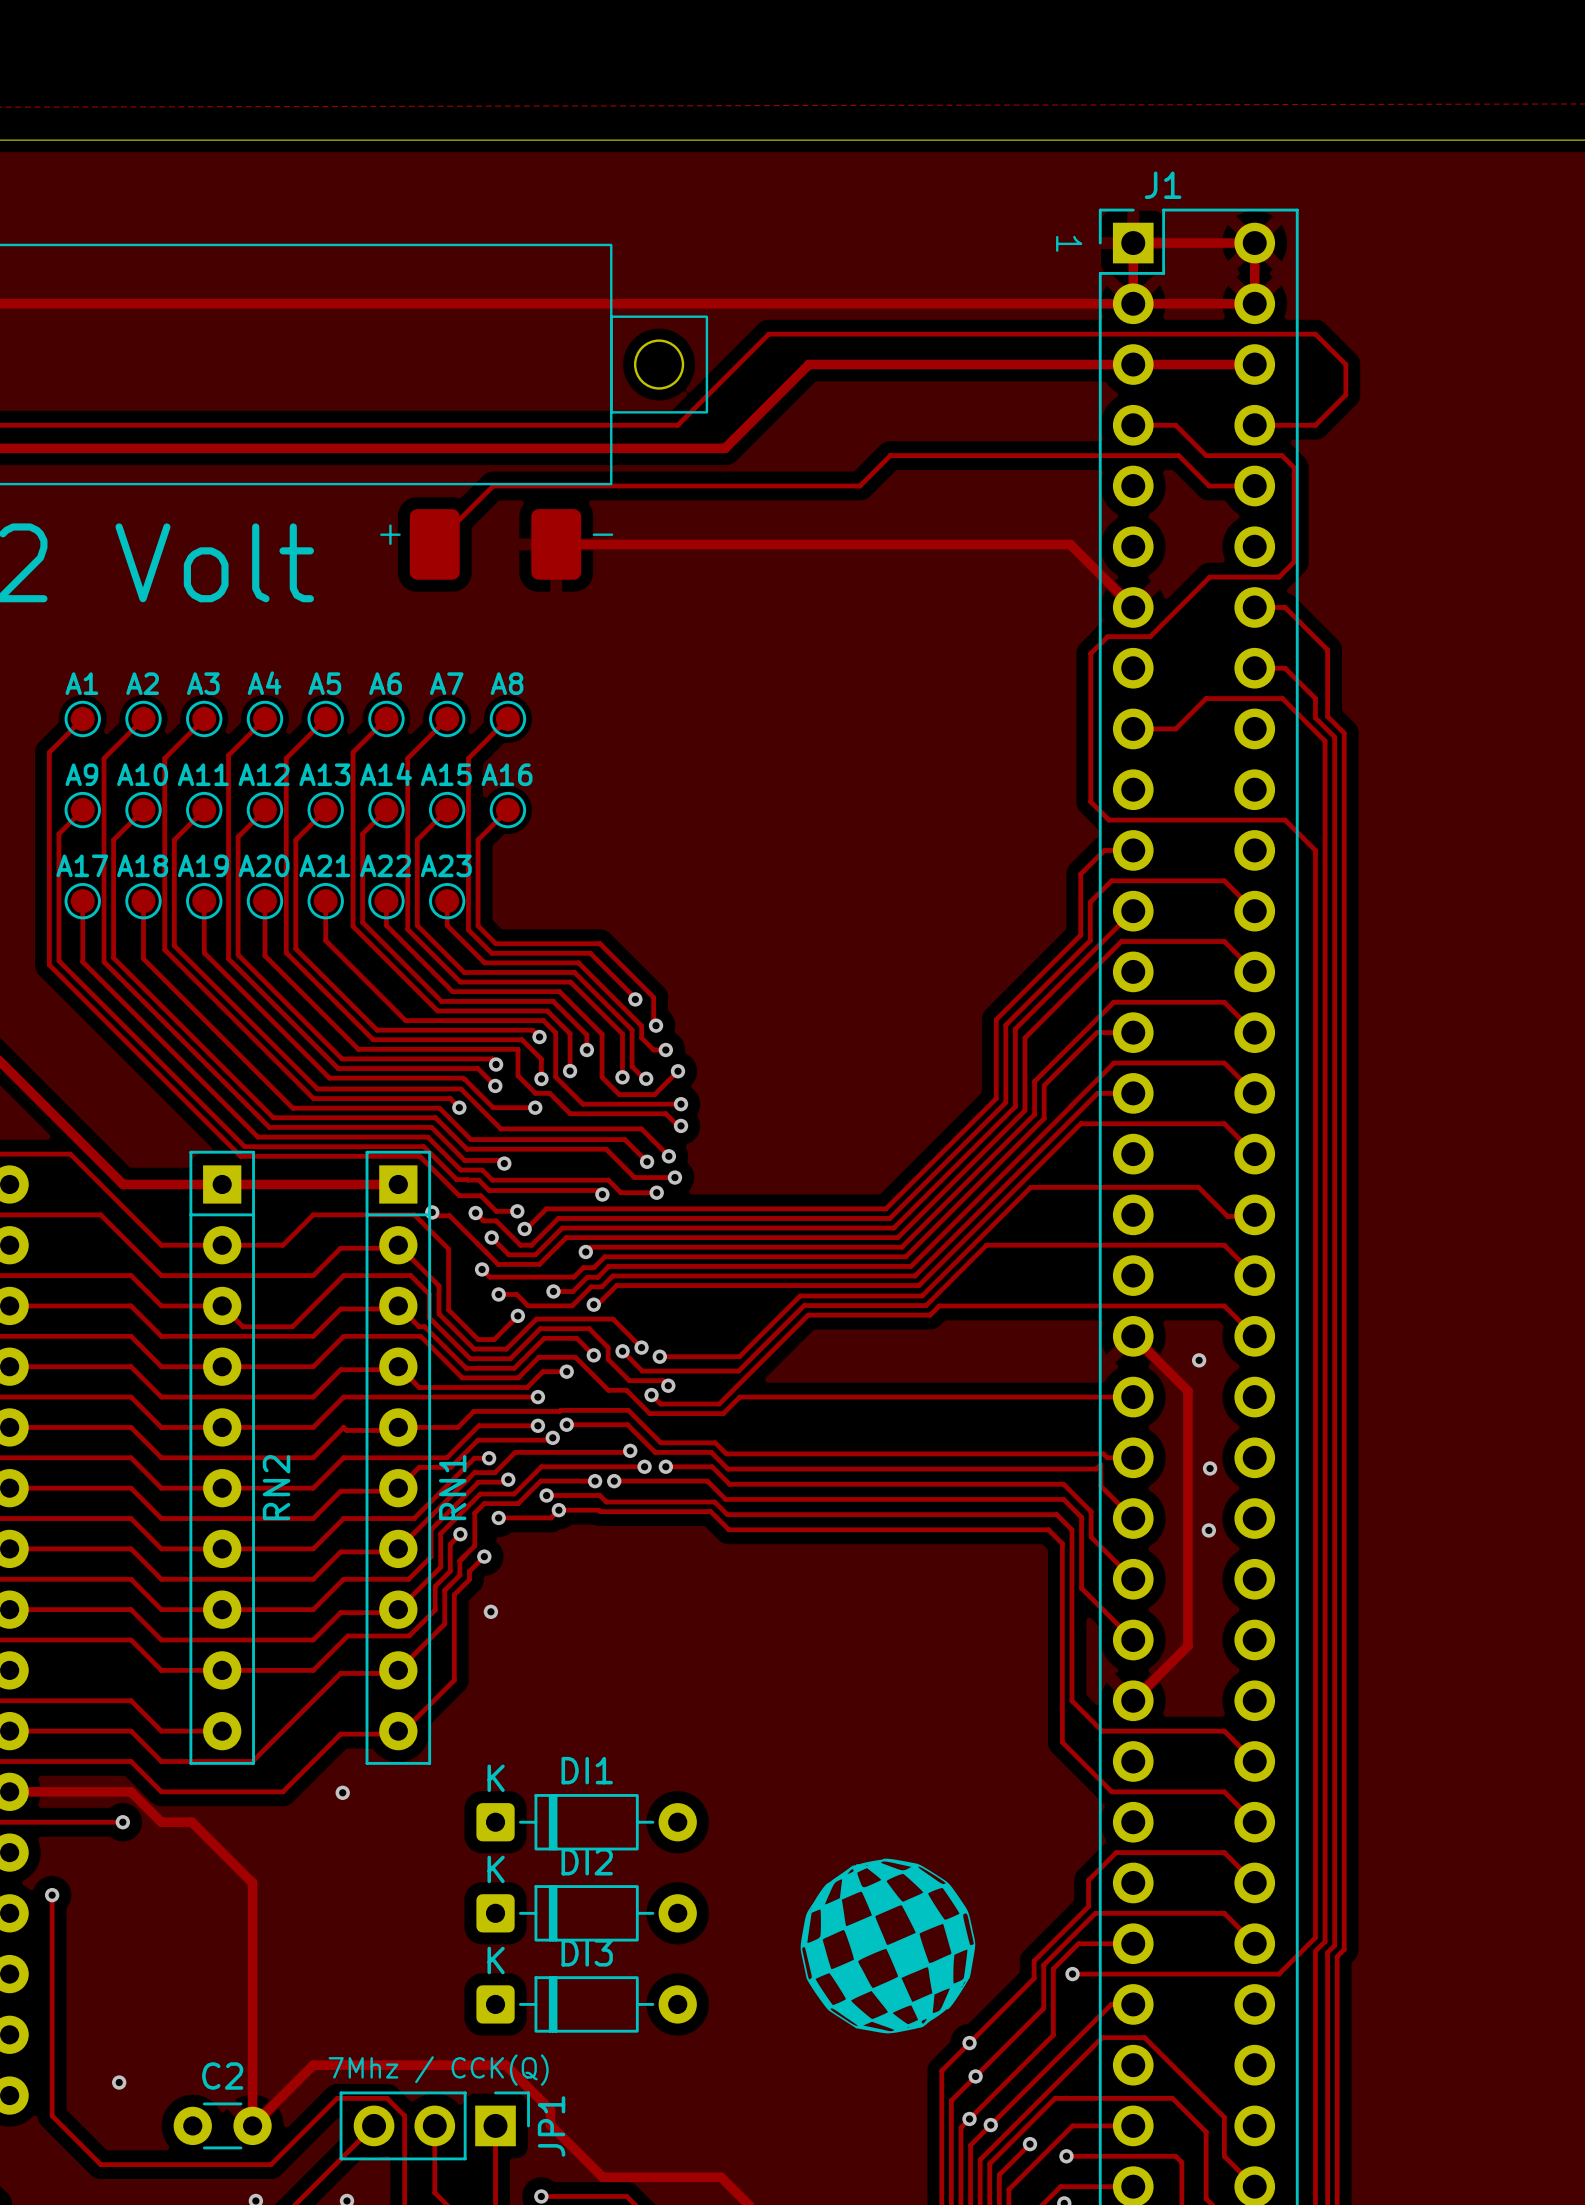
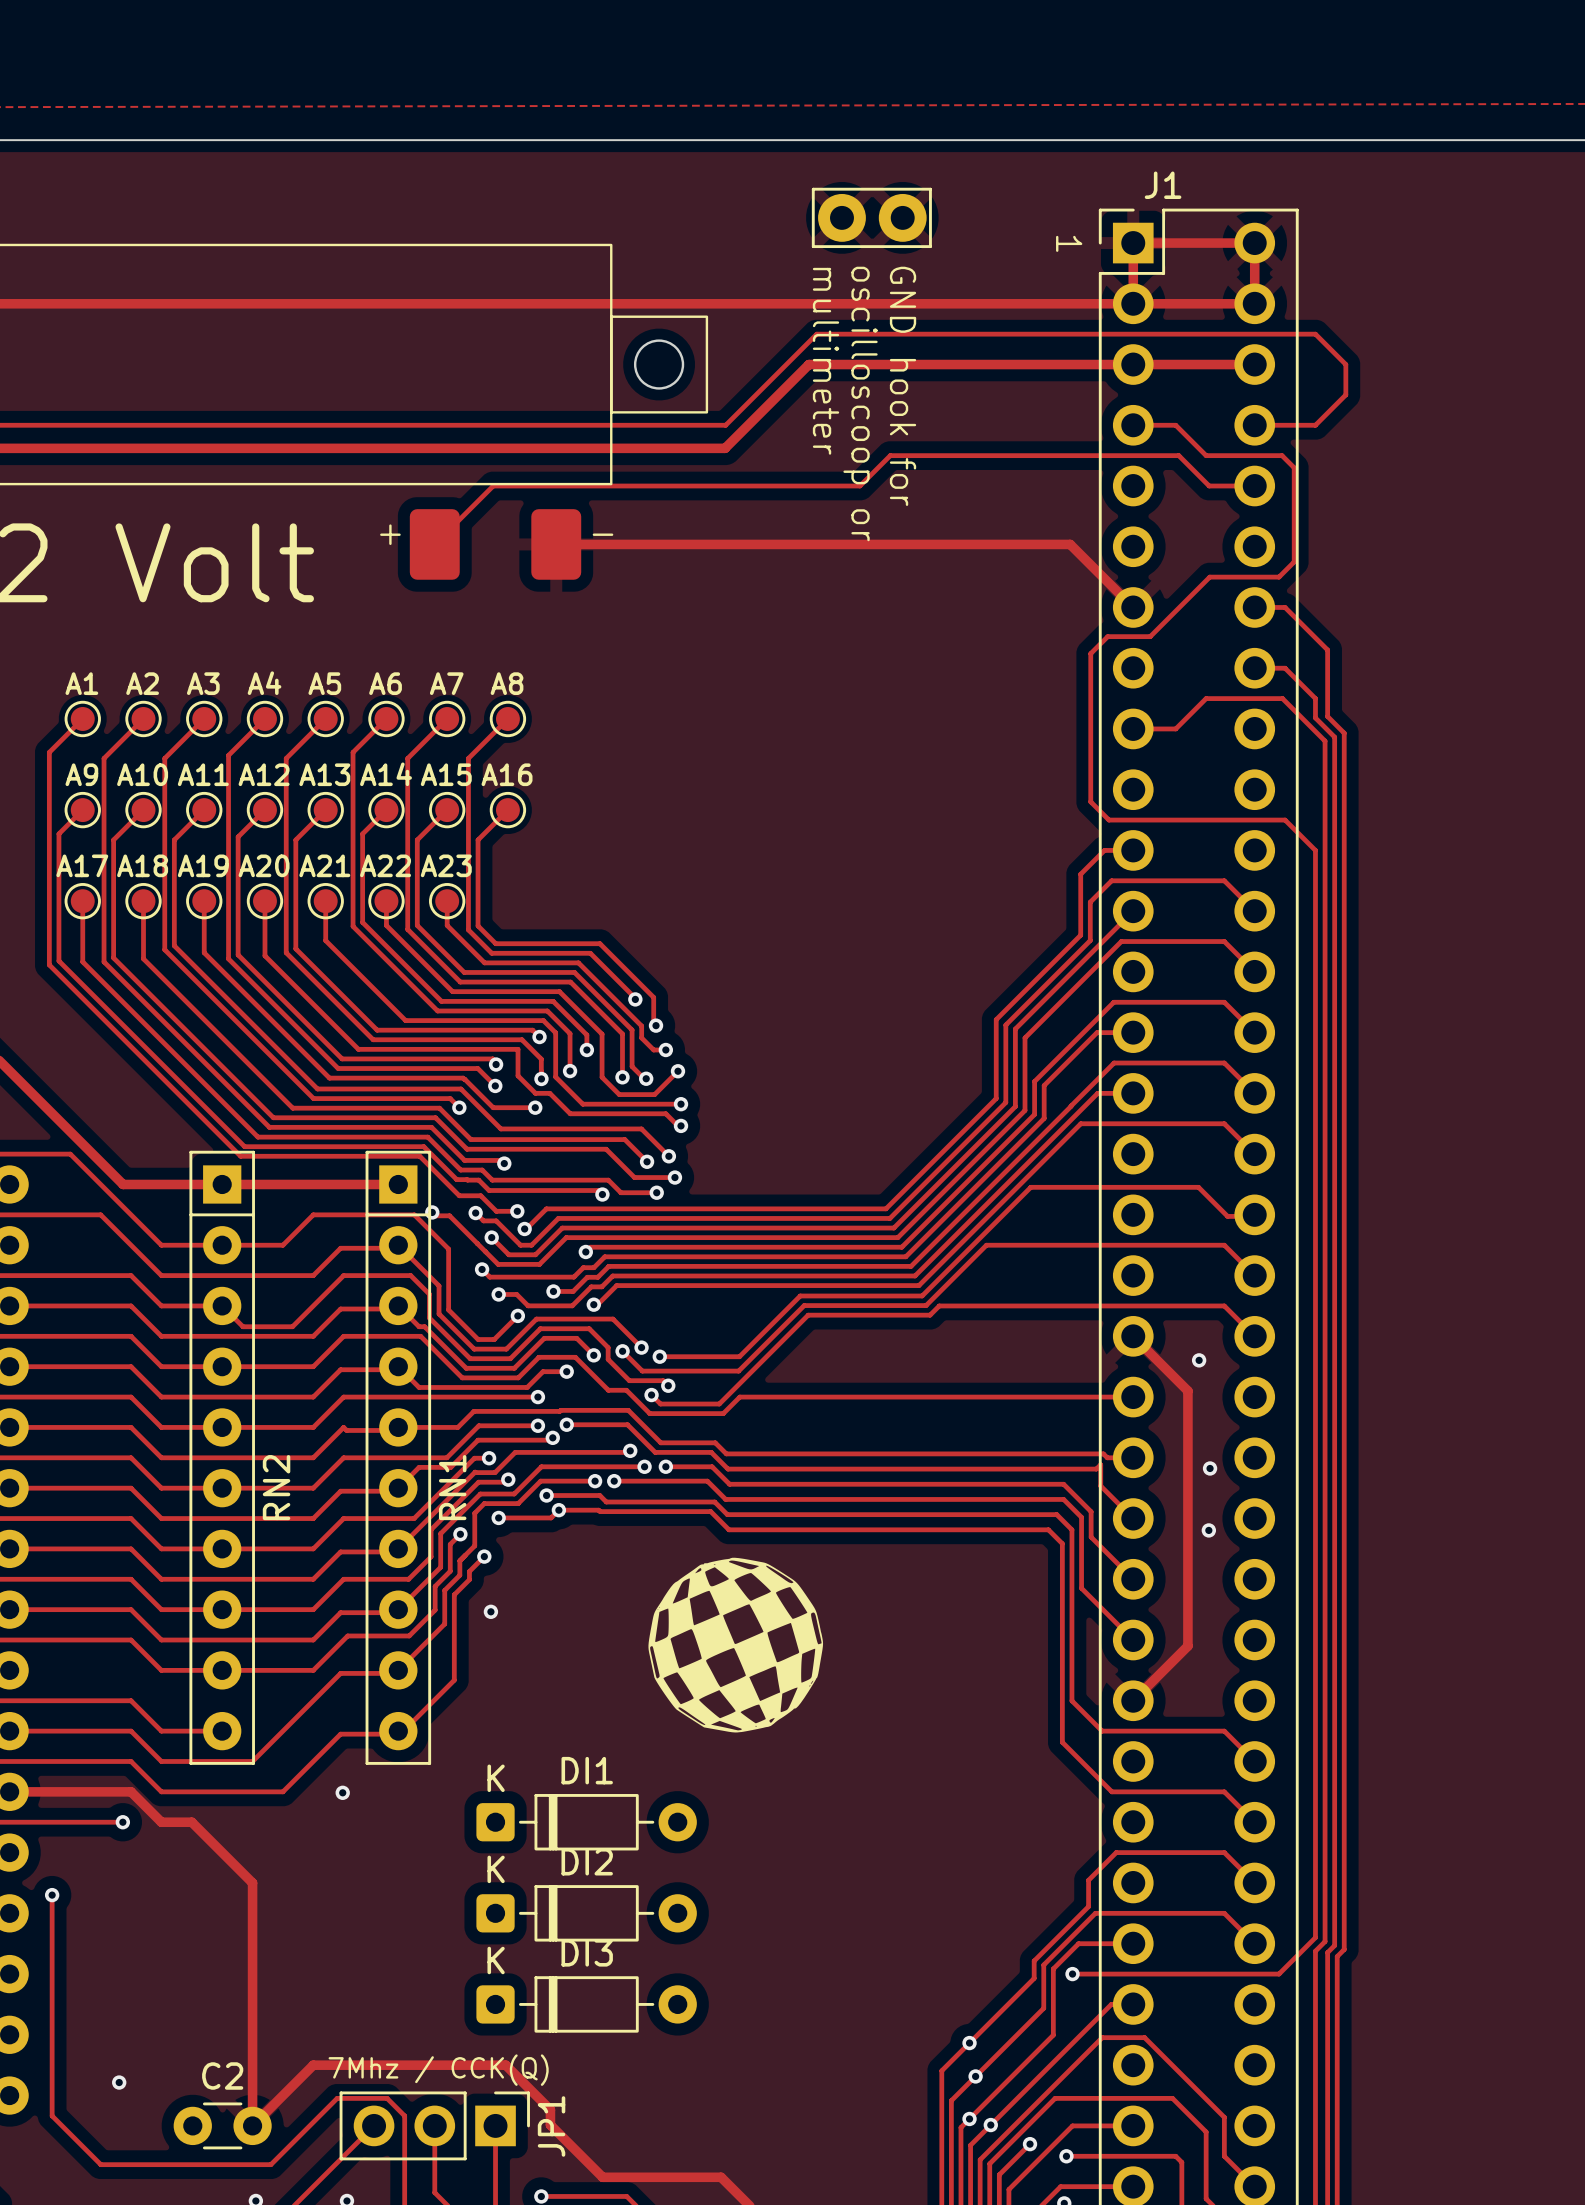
part: none -> (871, 217)
track: (816, 334) (768, 334) (677, 425) -> (816, 334) (725, 425) (677, 425)
text: none -> multimeter (826, 361)
text: none -> GND hook for (903, 386)
text: none -> oscilloscoop or (860, 403)
drawing position: (887, 1946) -> (735, 1645)

